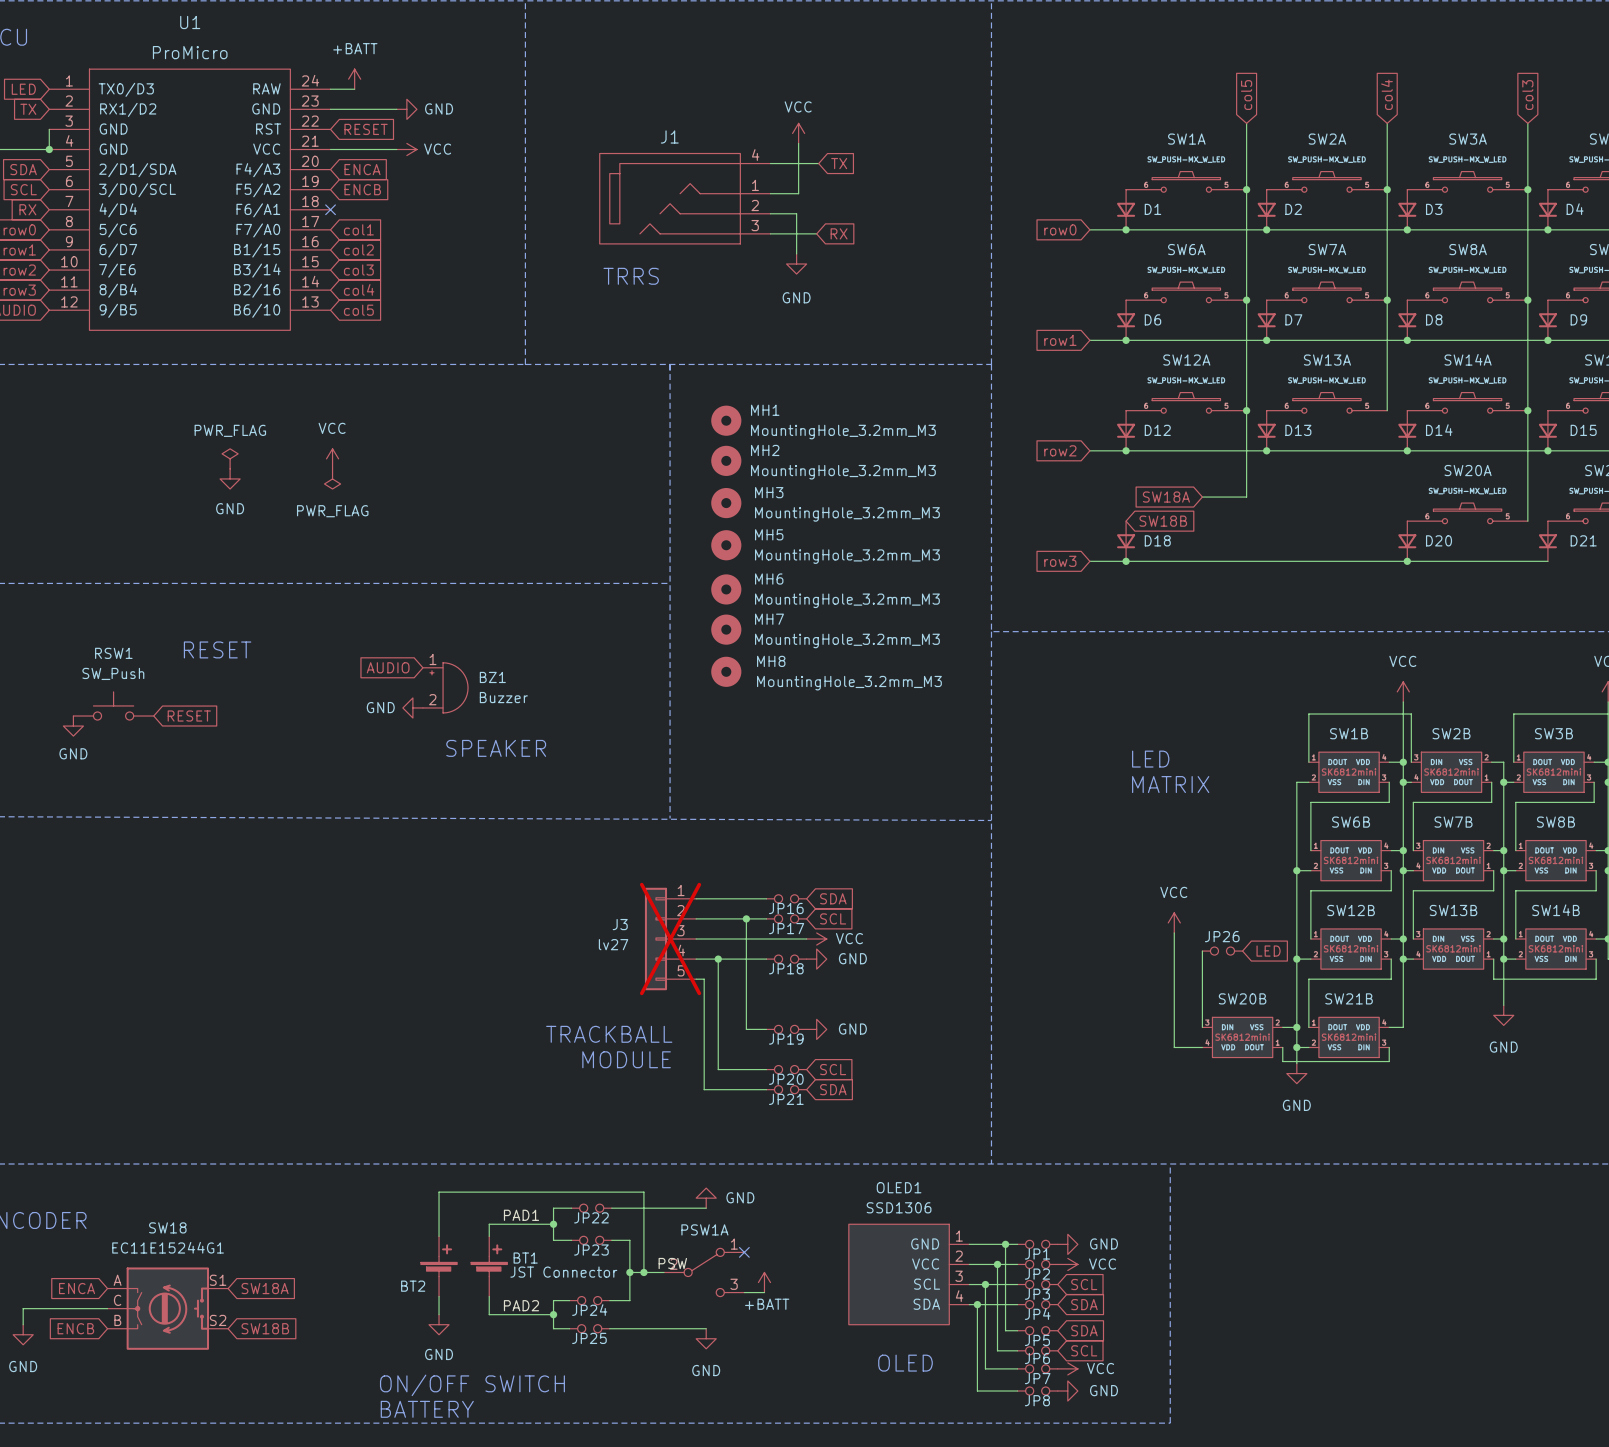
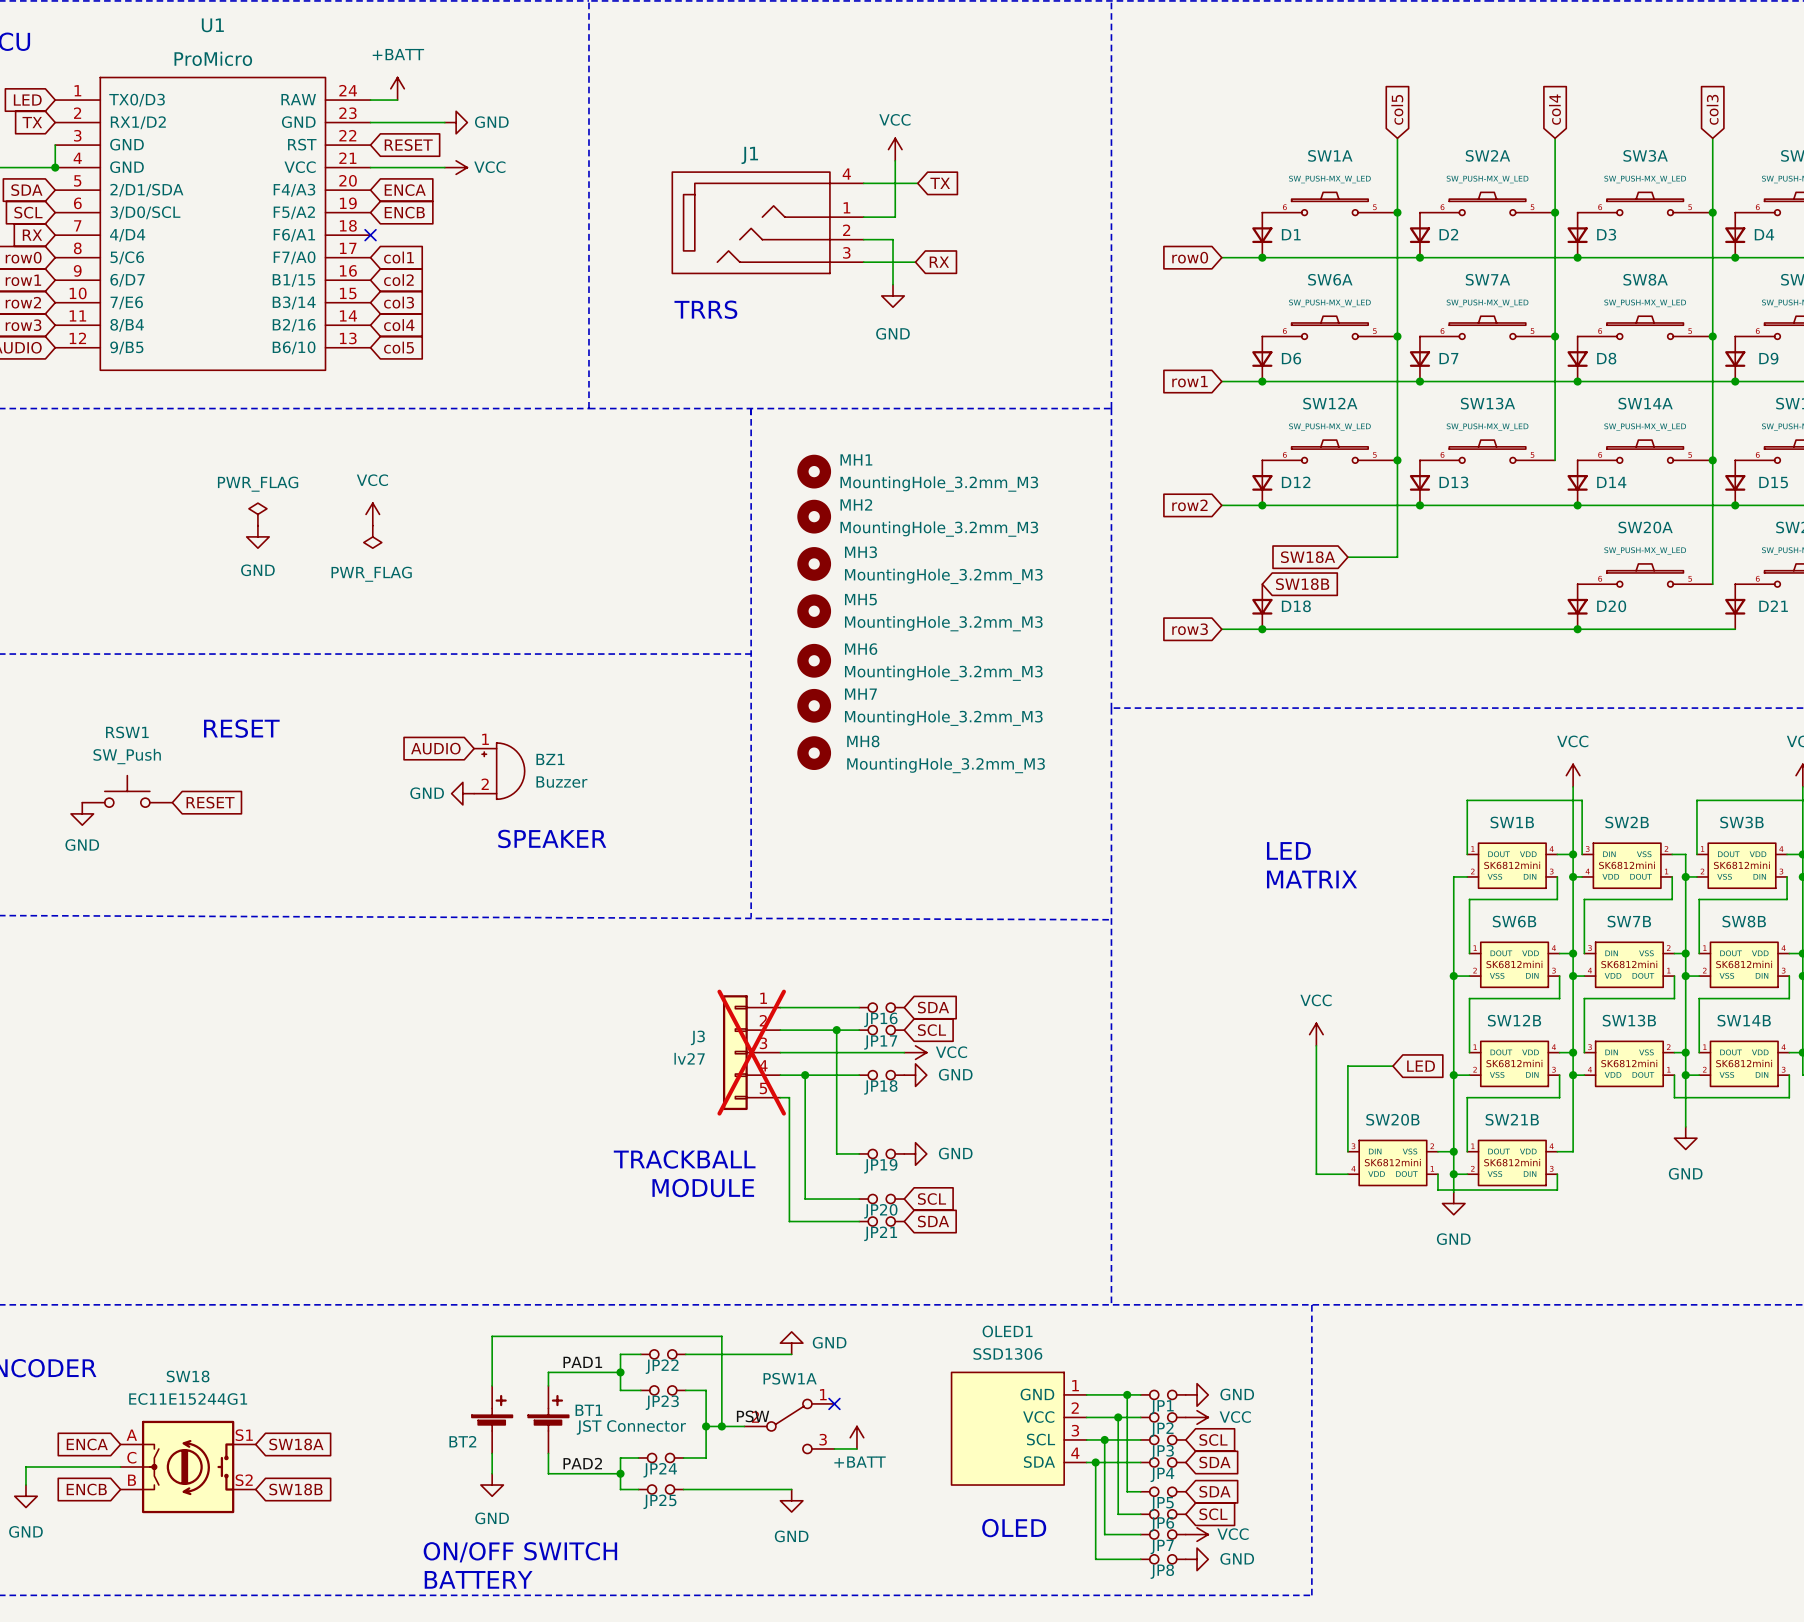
JP26: (1222, 951) -> none

